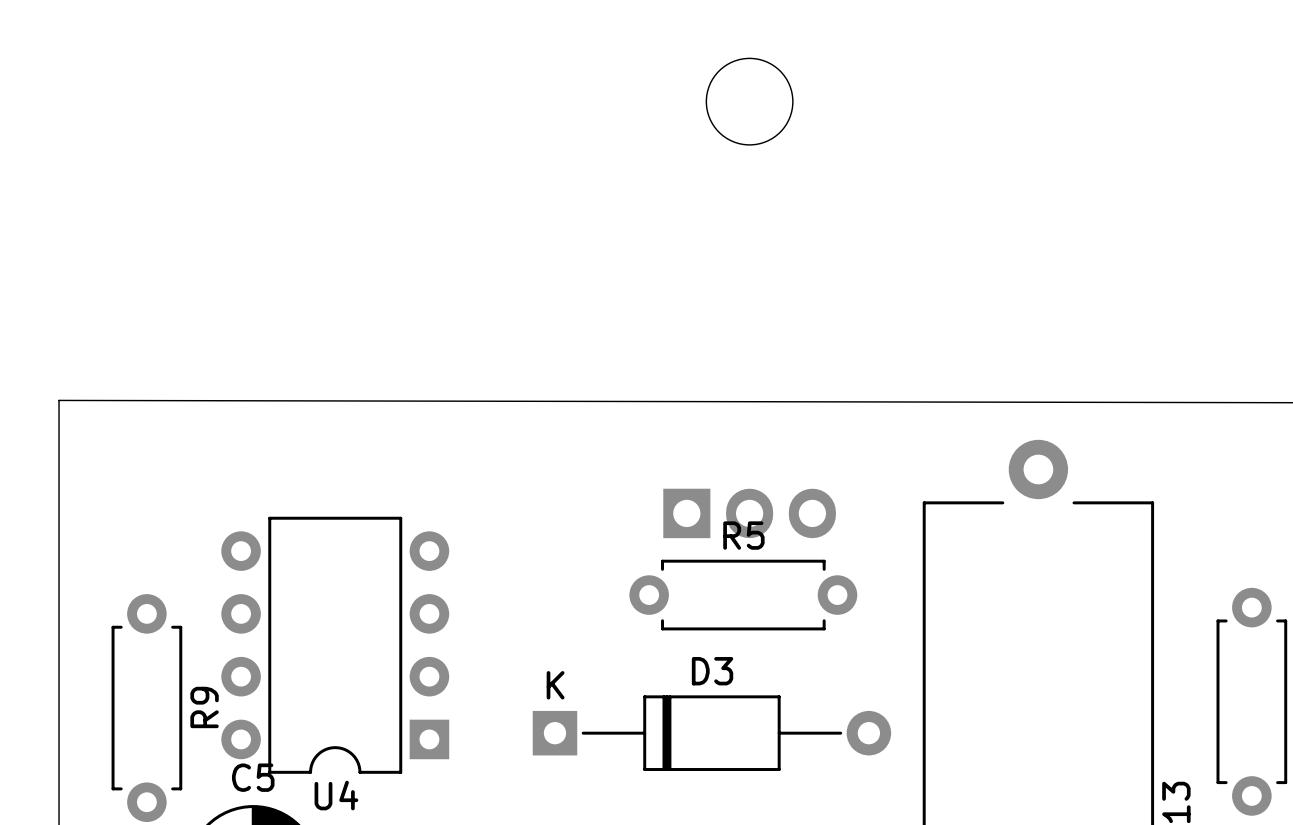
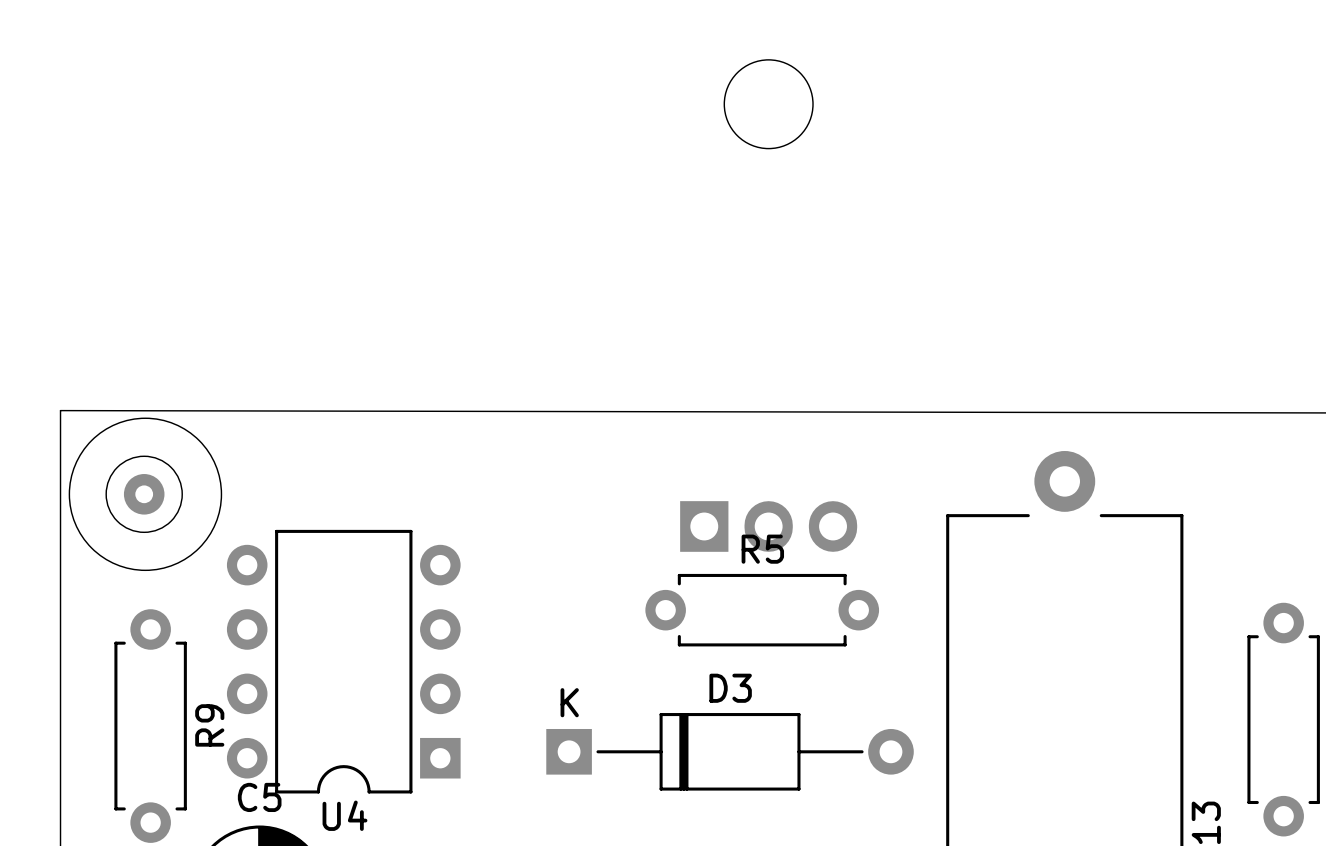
round board edge: none -> [68, 417, 223, 571]
drawing: none -> [105, 455, 183, 533]
via: none -> (144, 494)

